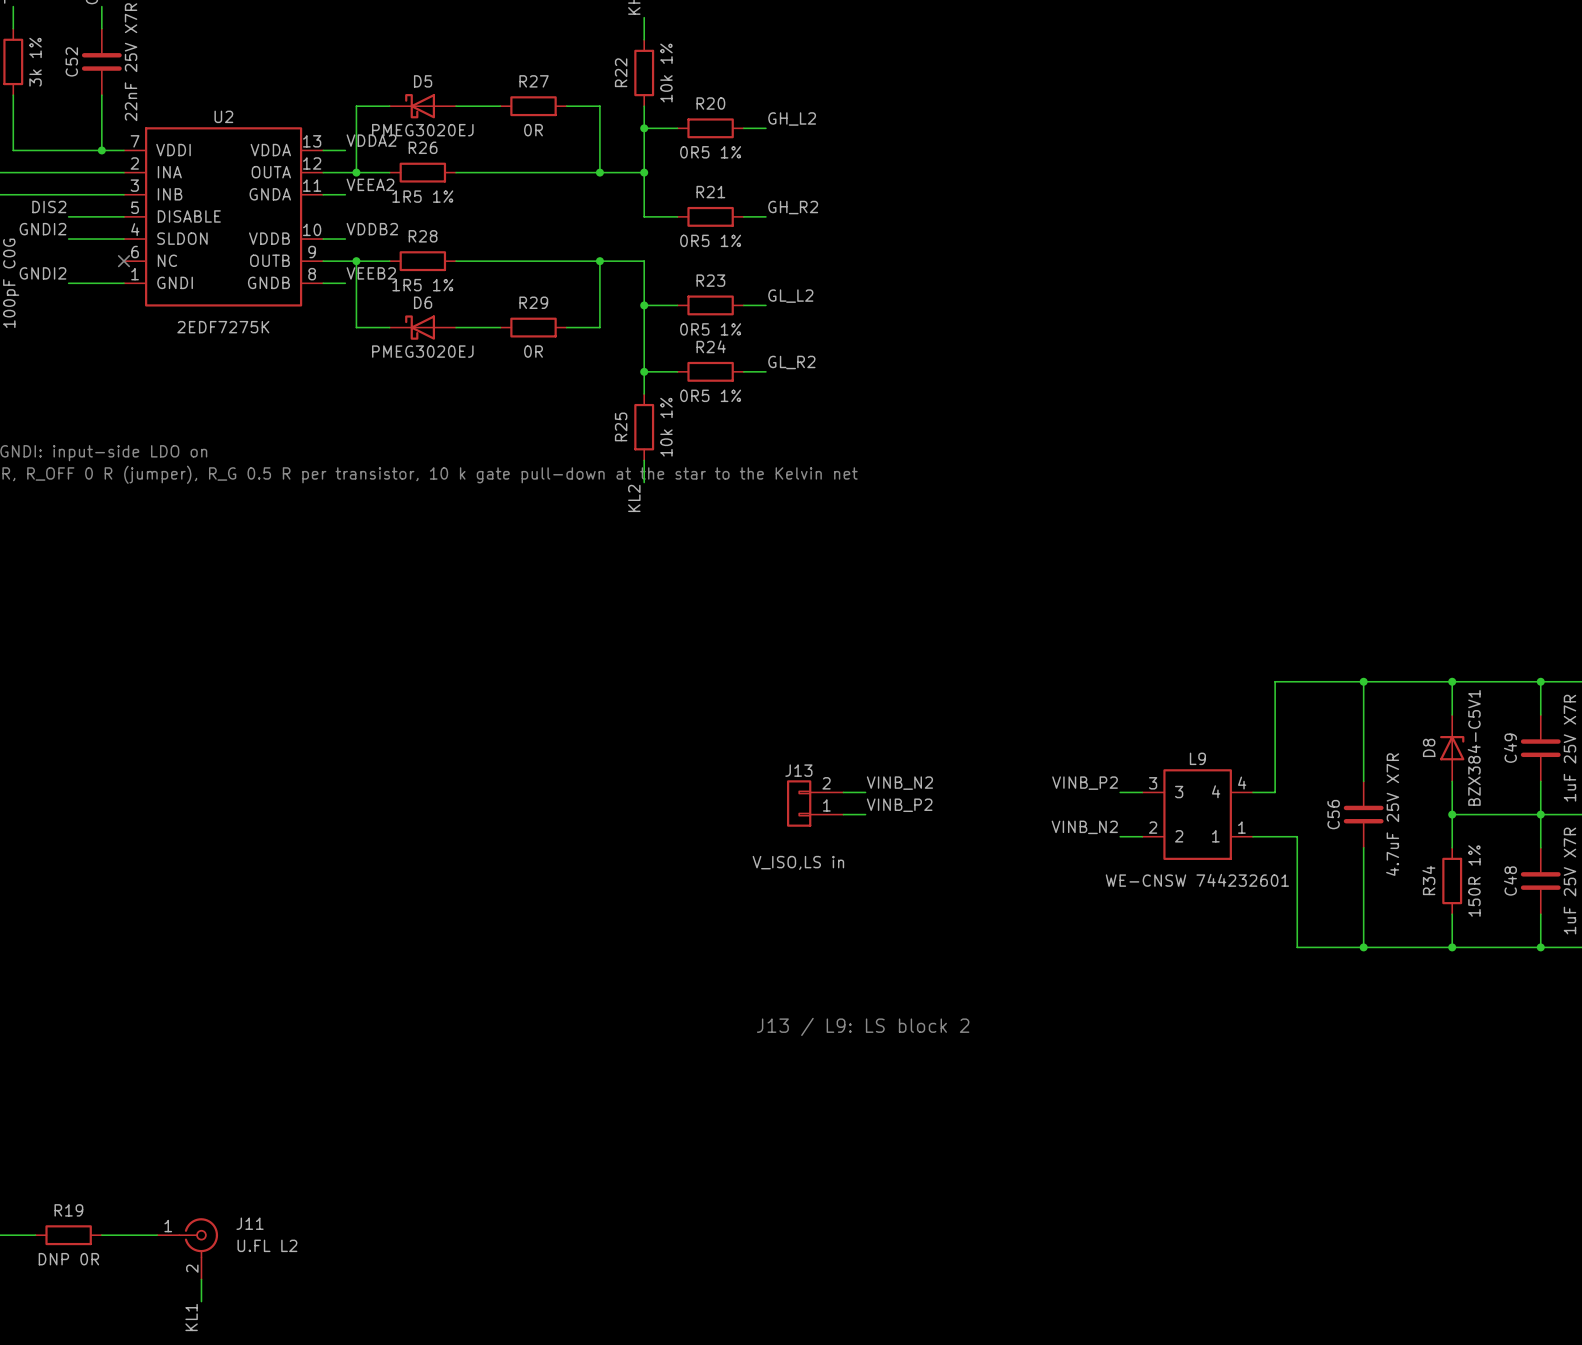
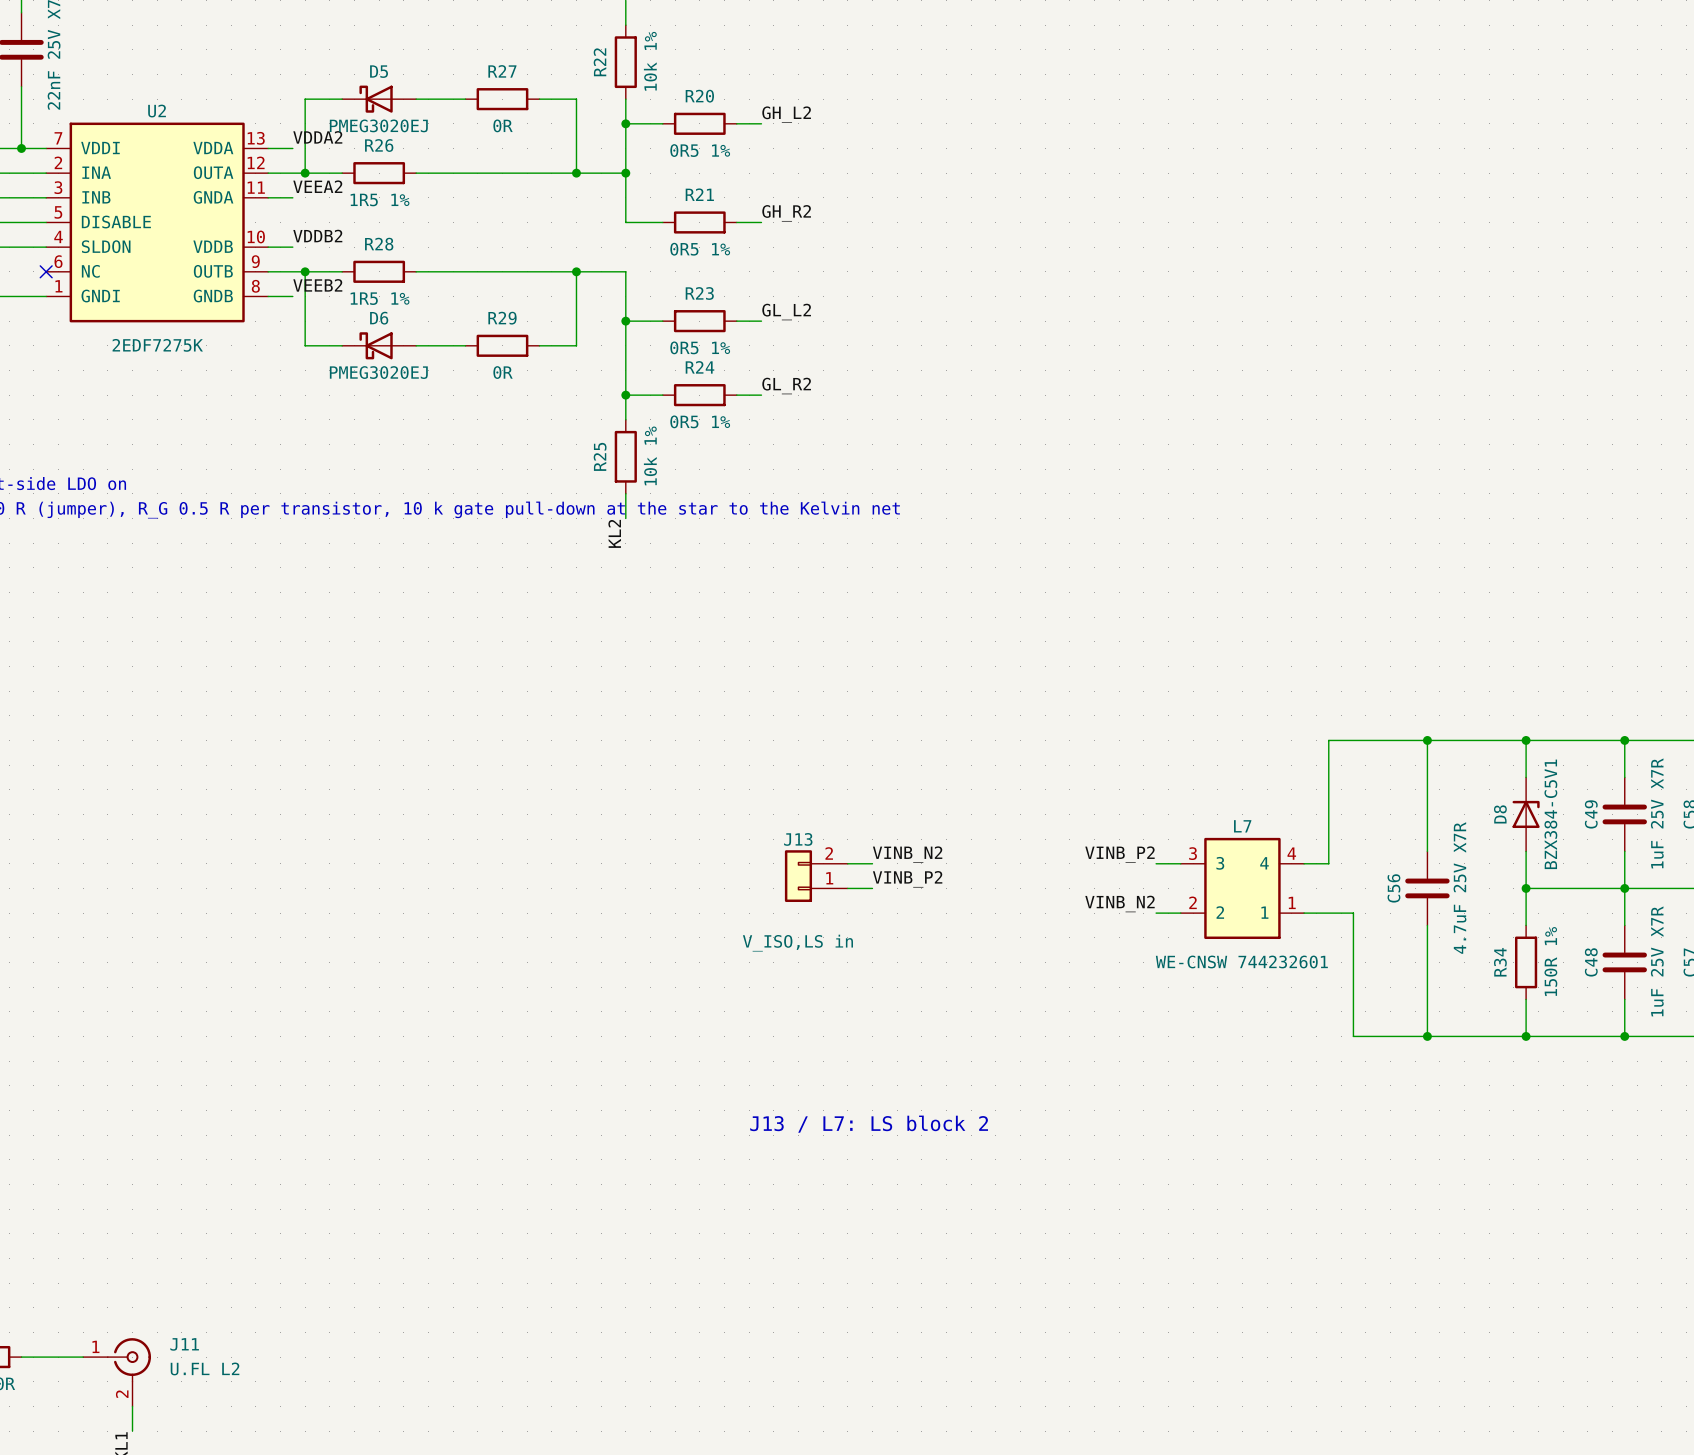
L9 name: L9 (1197, 758) -> L7 (1242, 826)
text: J13 / L9: LS block 2 (863, 1026) -> J13 / L7: LS block 2 (869, 1124)

